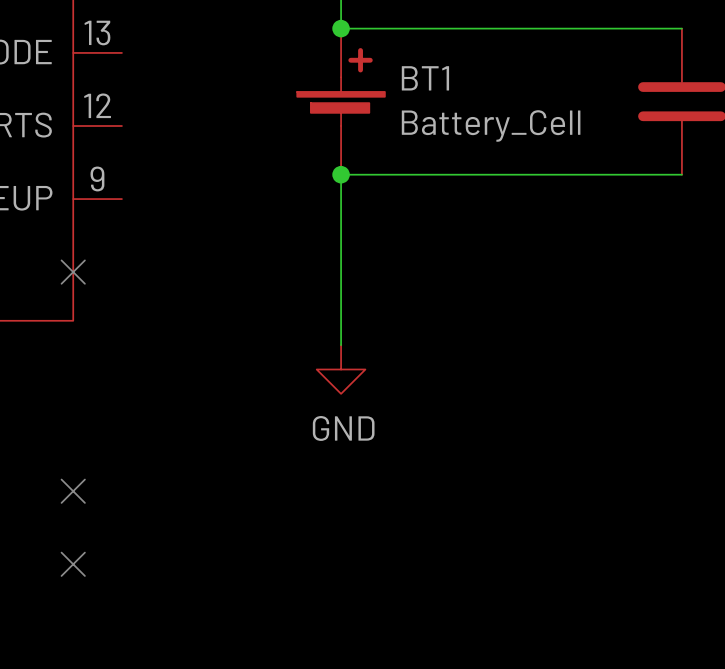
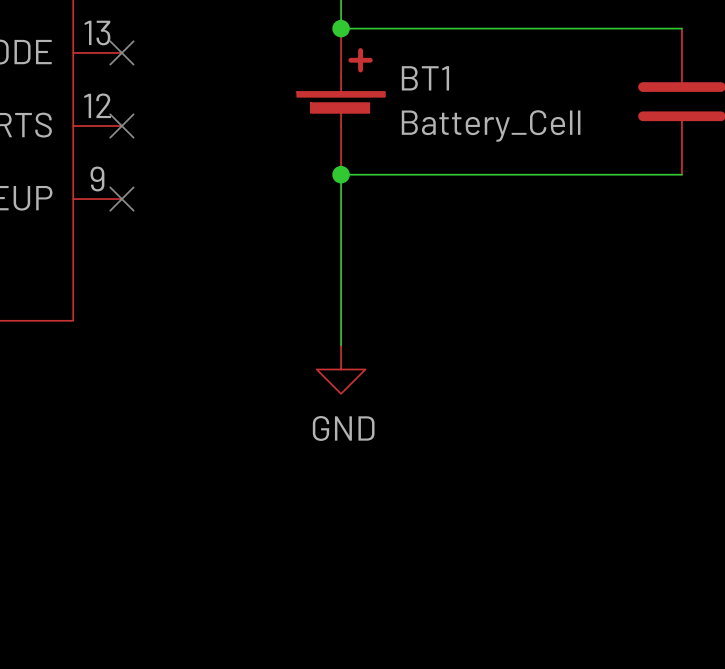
no-connect mark: none -> (121, 52)
no-connect mark: none -> (121, 126)
no-connect mark: none -> (121, 199)
no-connect mark: (73, 272) -> none
no-connect mark: (73, 491) -> none
no-connect mark: (73, 564) -> none

